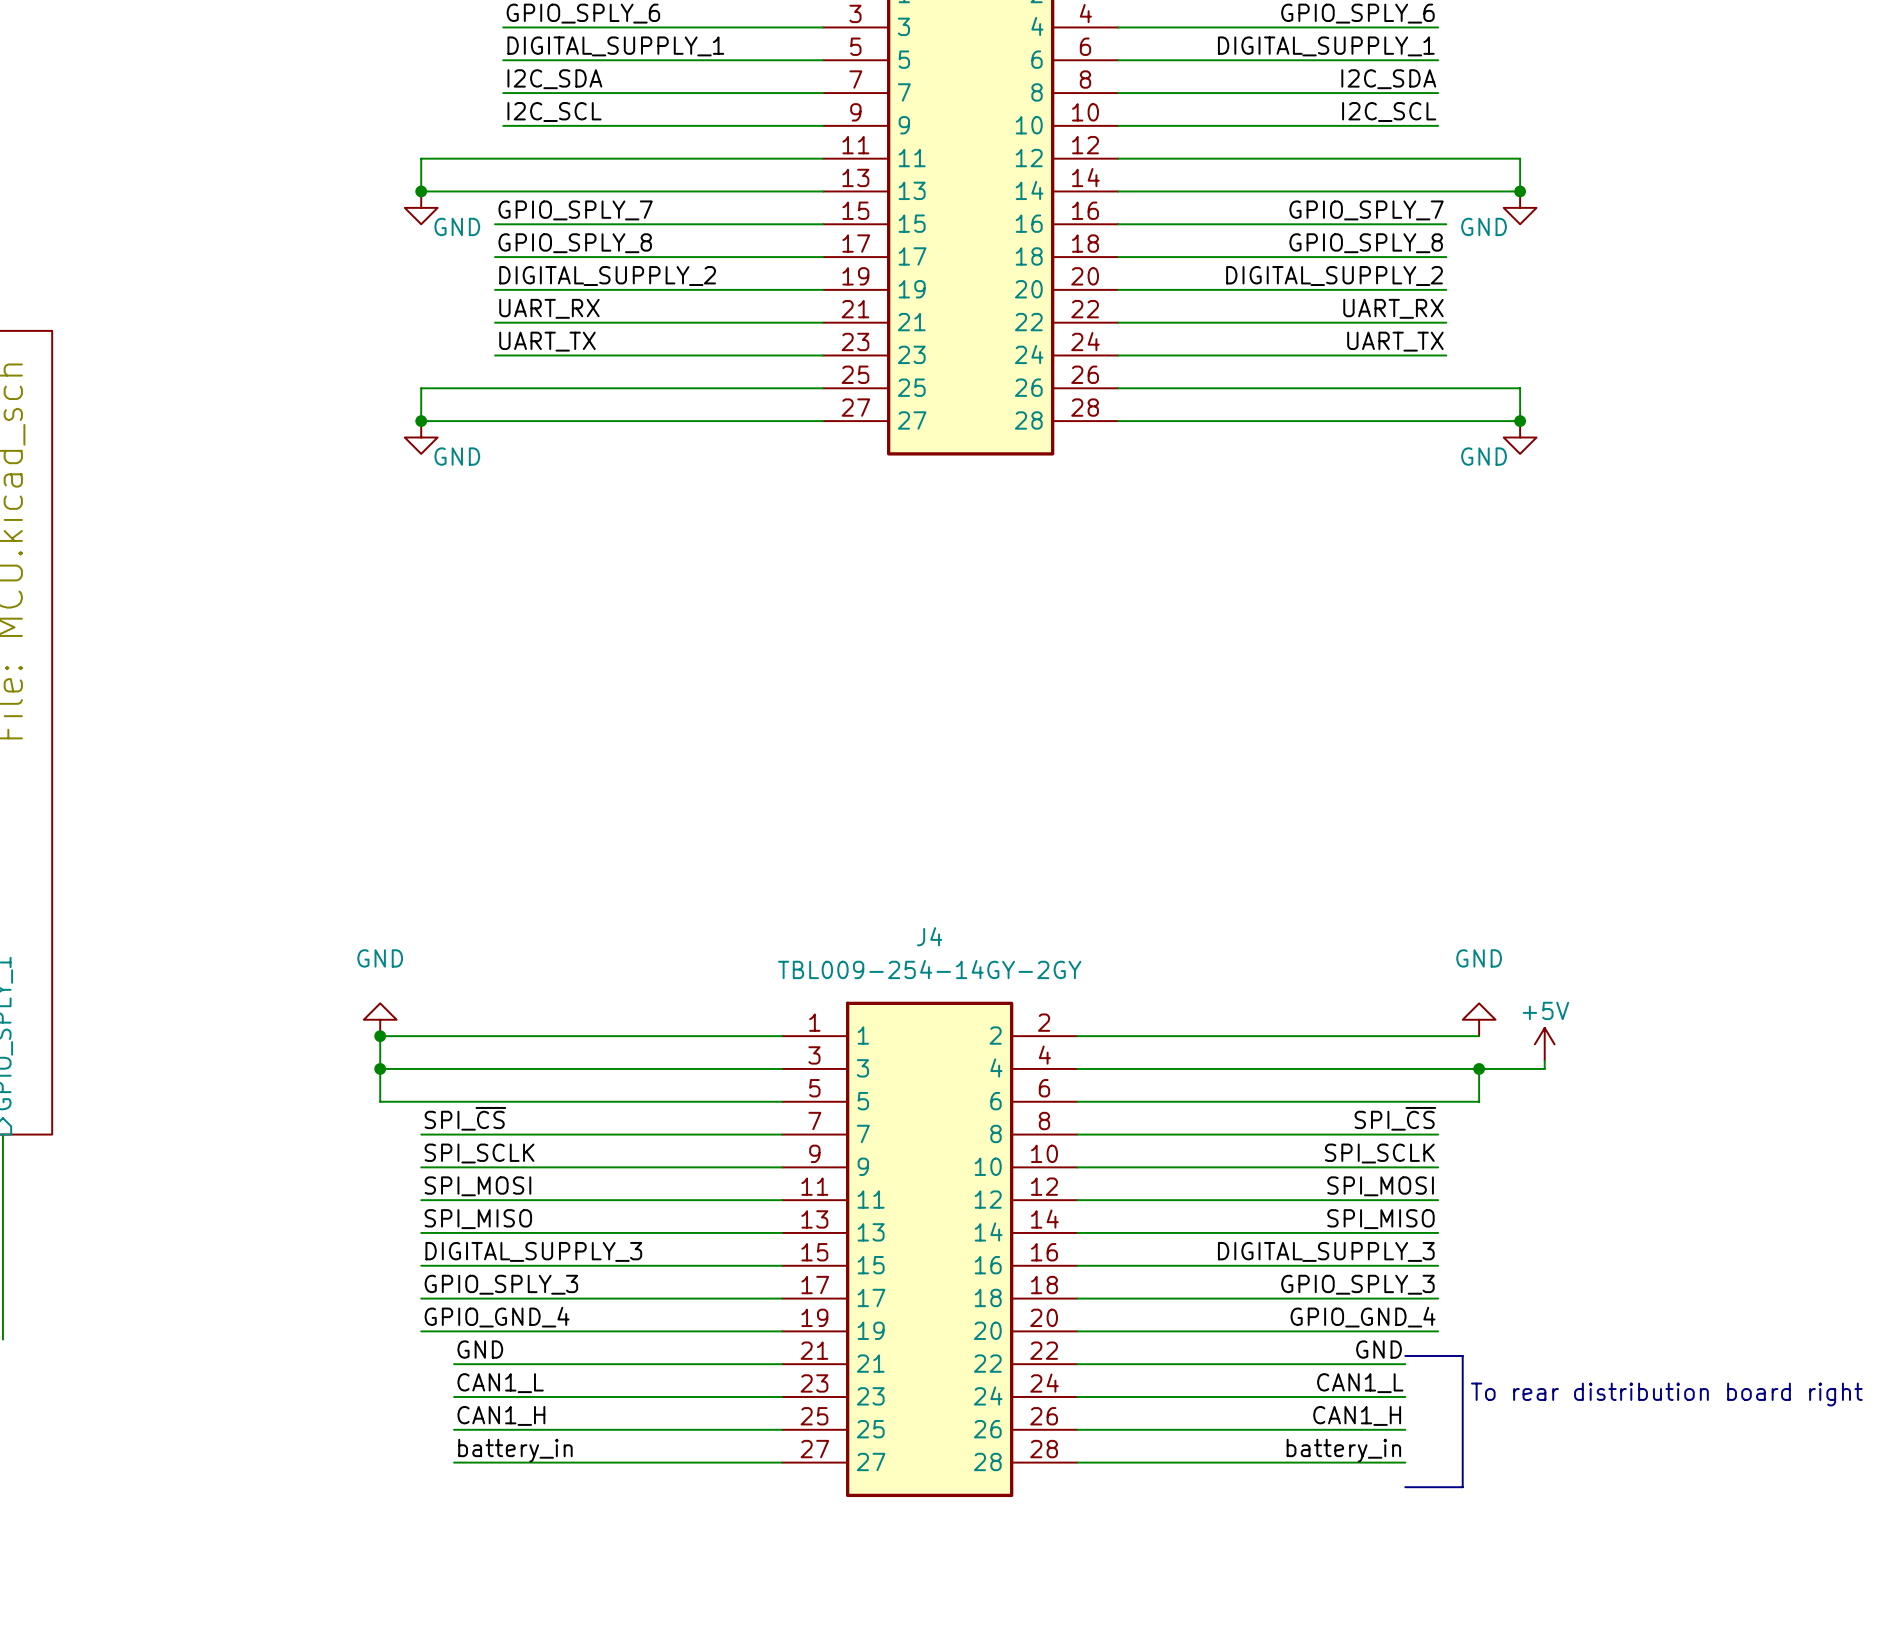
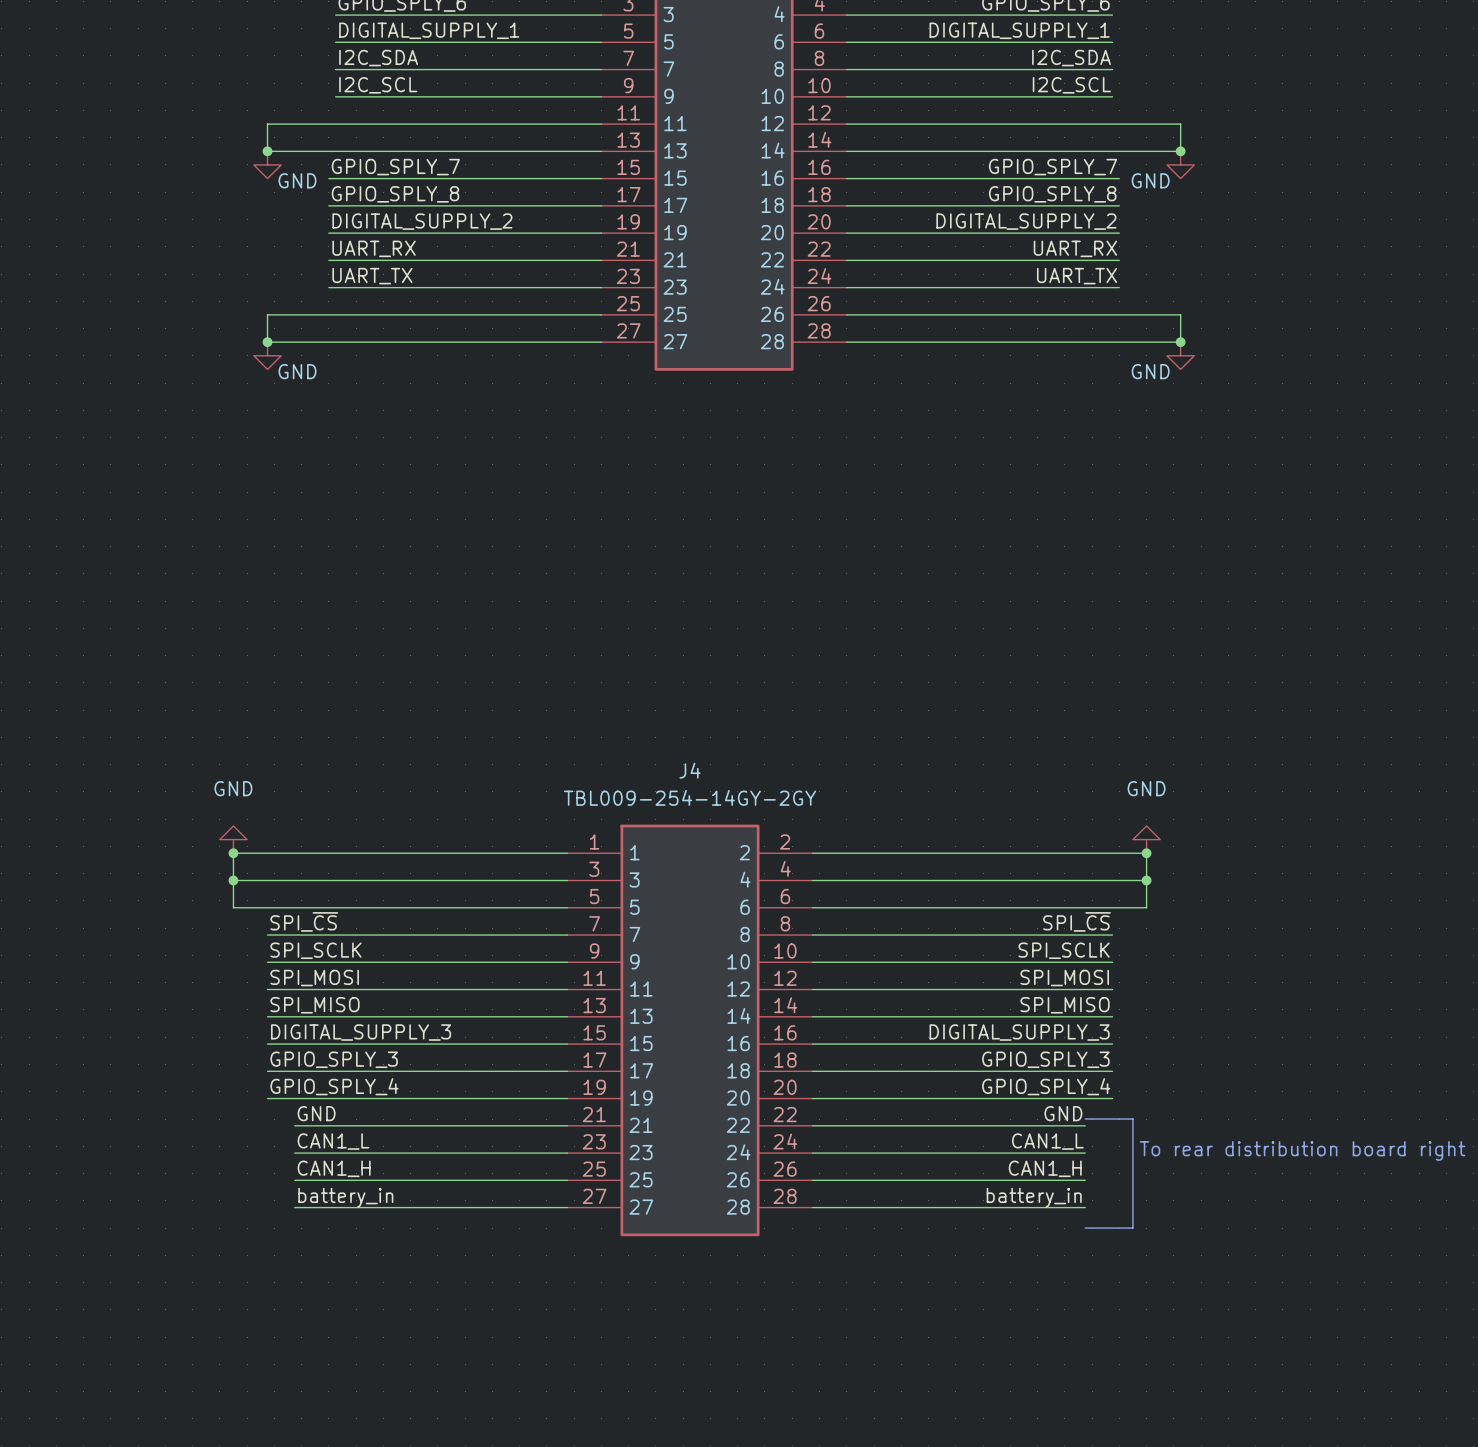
junction: none -> (1146, 853)
power symbol: +5V (1544, 1044) -> none
wire: (1544, 1060) (1544, 1068) (1479, 1068) -> (1146, 853) (1146, 880)
label: GPIO_GND_4 (497, 1317) -> GPIO_SPLY_4 (334, 1086)
label: GPIO_GND_4 (1363, 1317) -> GPIO_SPLY_4 (1046, 1086)

